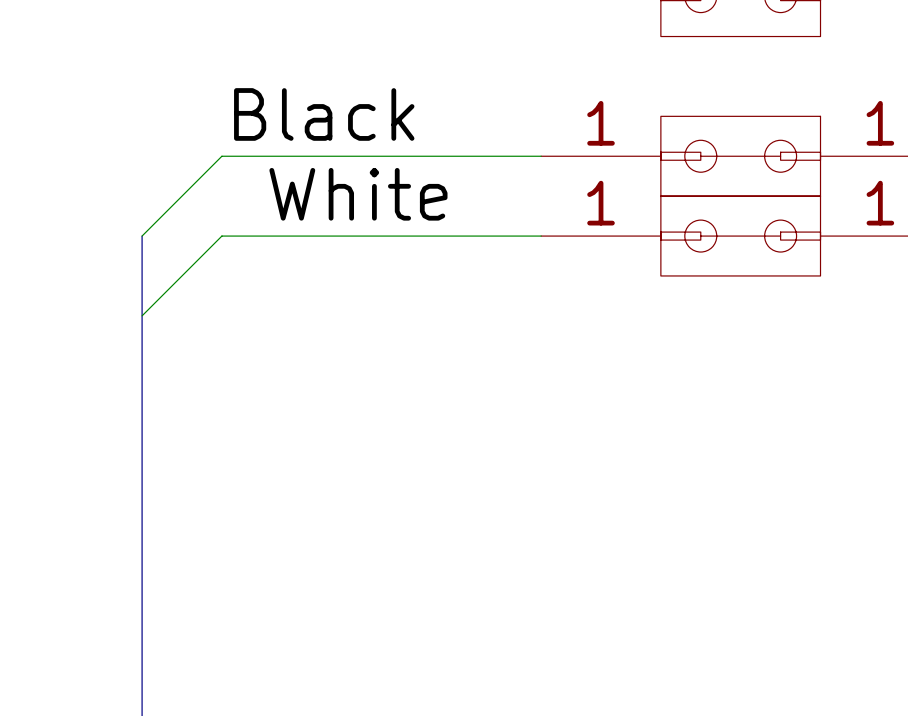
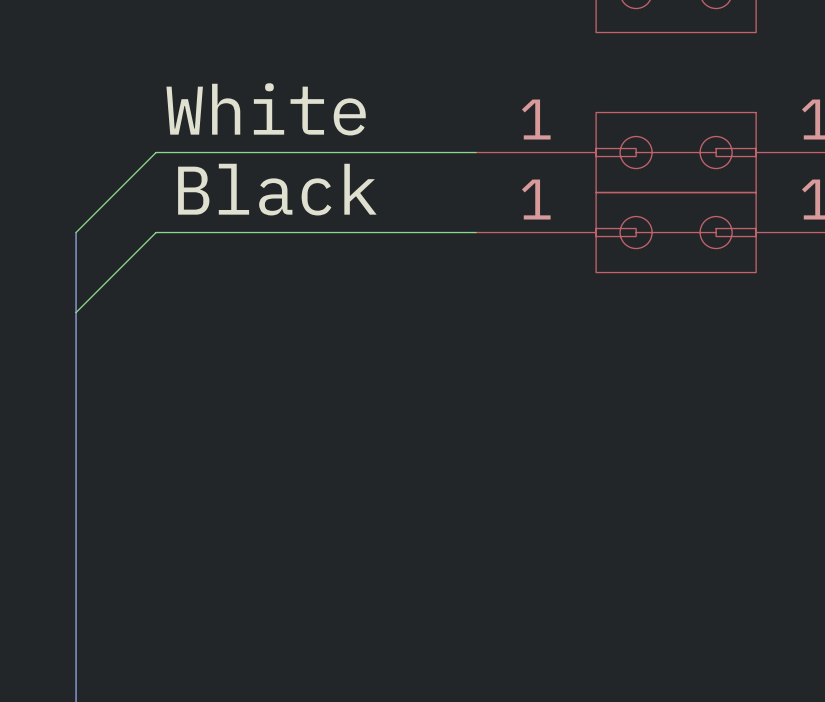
label position: Black (324, 114) -> Black (277, 189)
label position: White (358, 194) -> White (266, 109)

